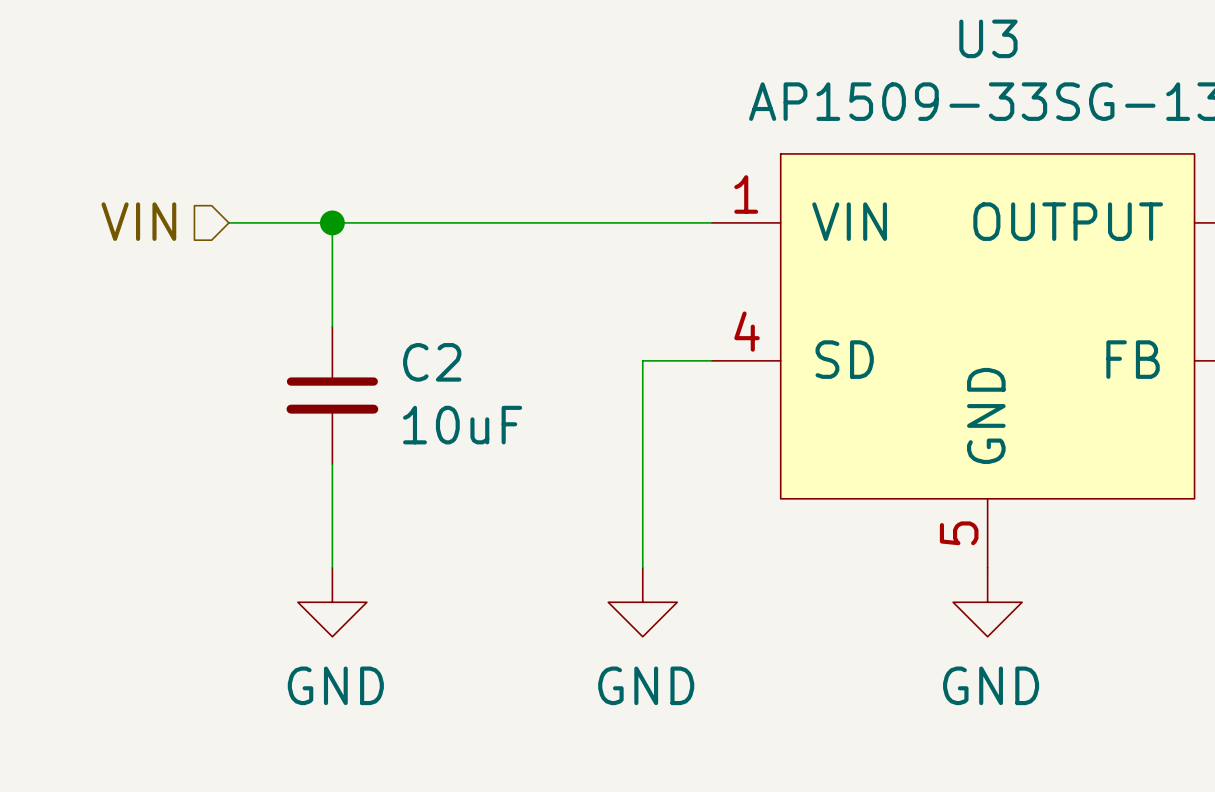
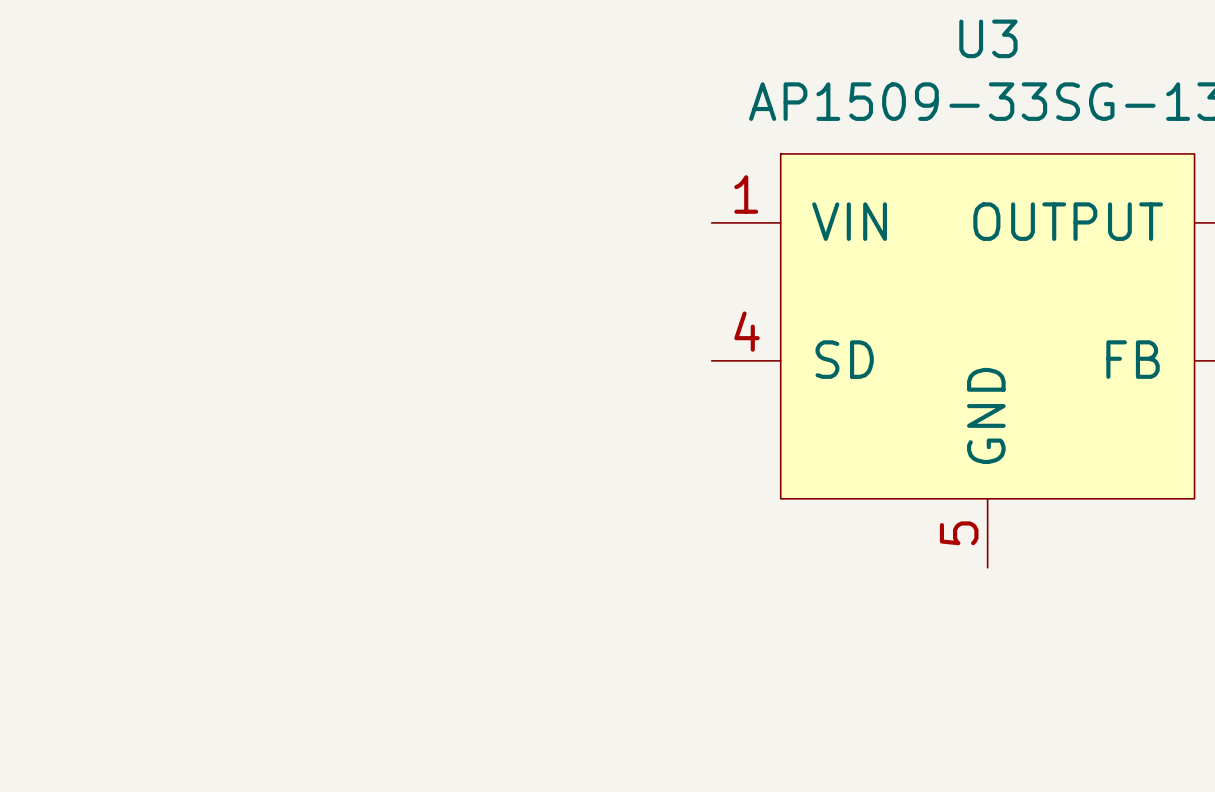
hierarchical label: VIN (138, 221) -> none
wire: (228, 222) (711, 222) -> none
wire: (332, 222) (332, 326) -> none
junction: (332, 222) -> none
wire: (711, 360) (642, 360) (642, 567) -> none
C2: 10uF (332, 395) -> none
wire: (332, 464) (332, 567) -> none
power symbol: GND (332, 602) -> none
power symbol: GND (642, 602) -> none
power symbol: GND (987, 602) -> none

